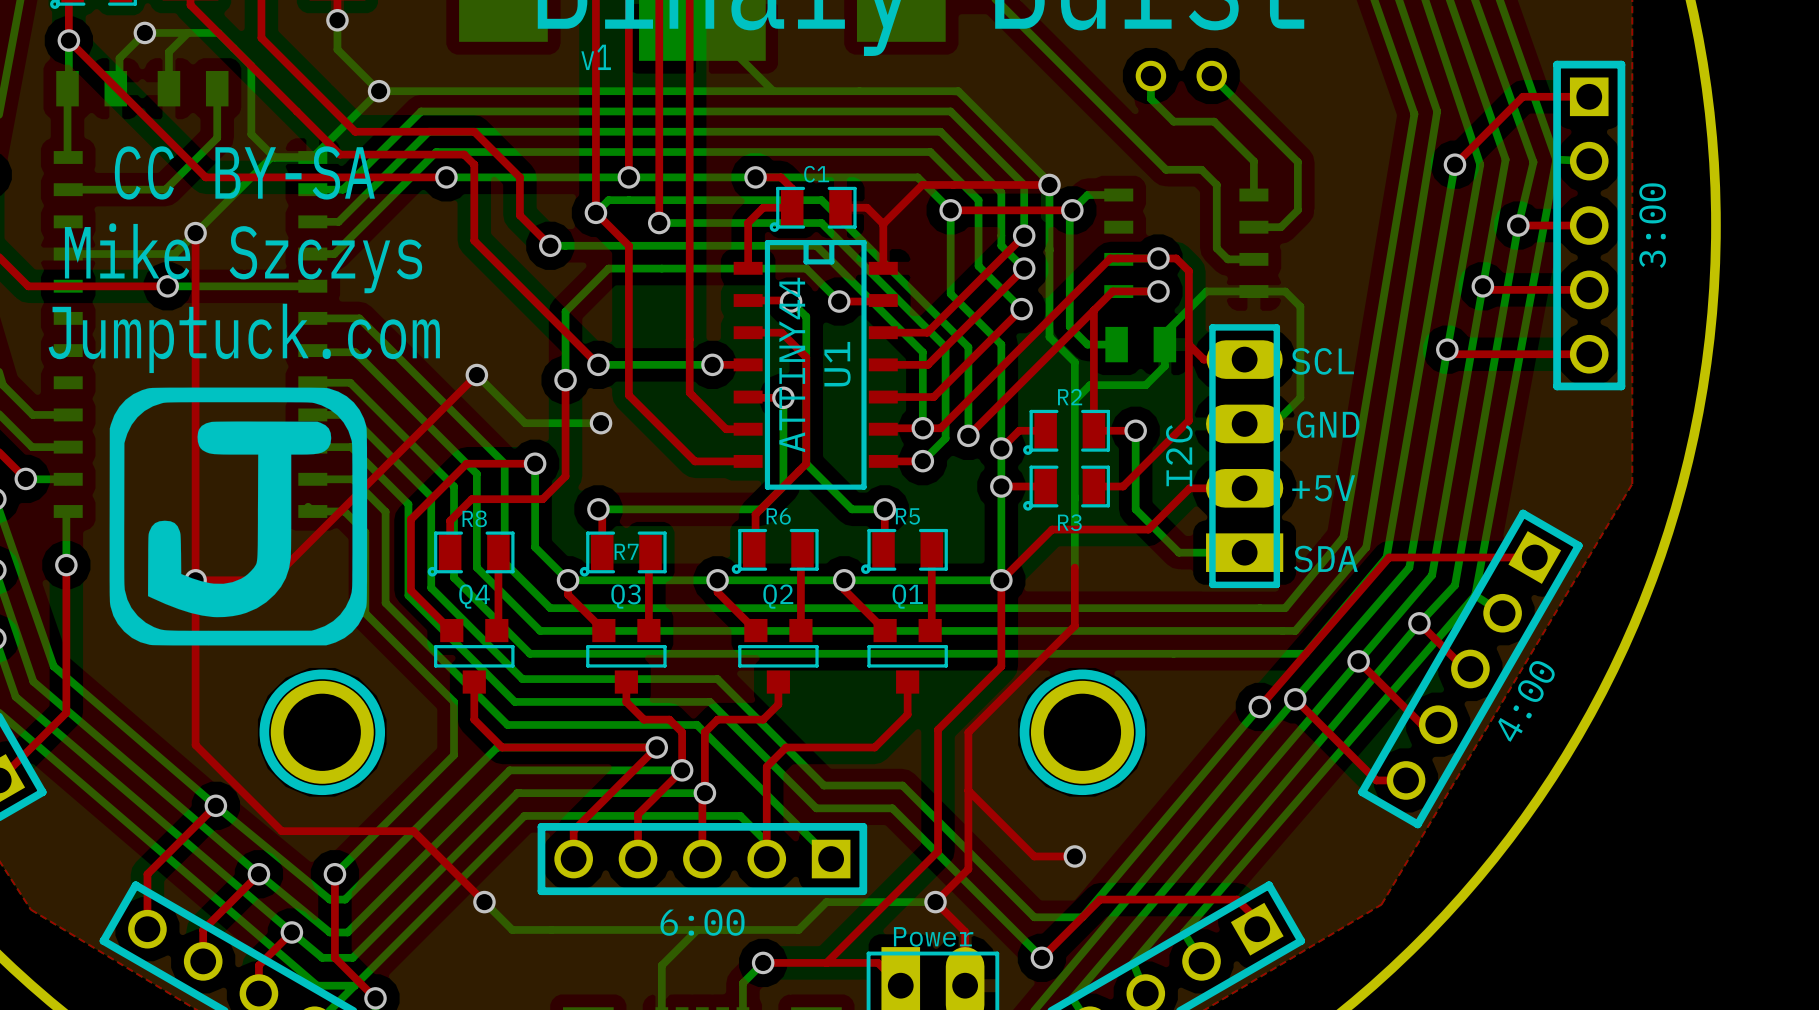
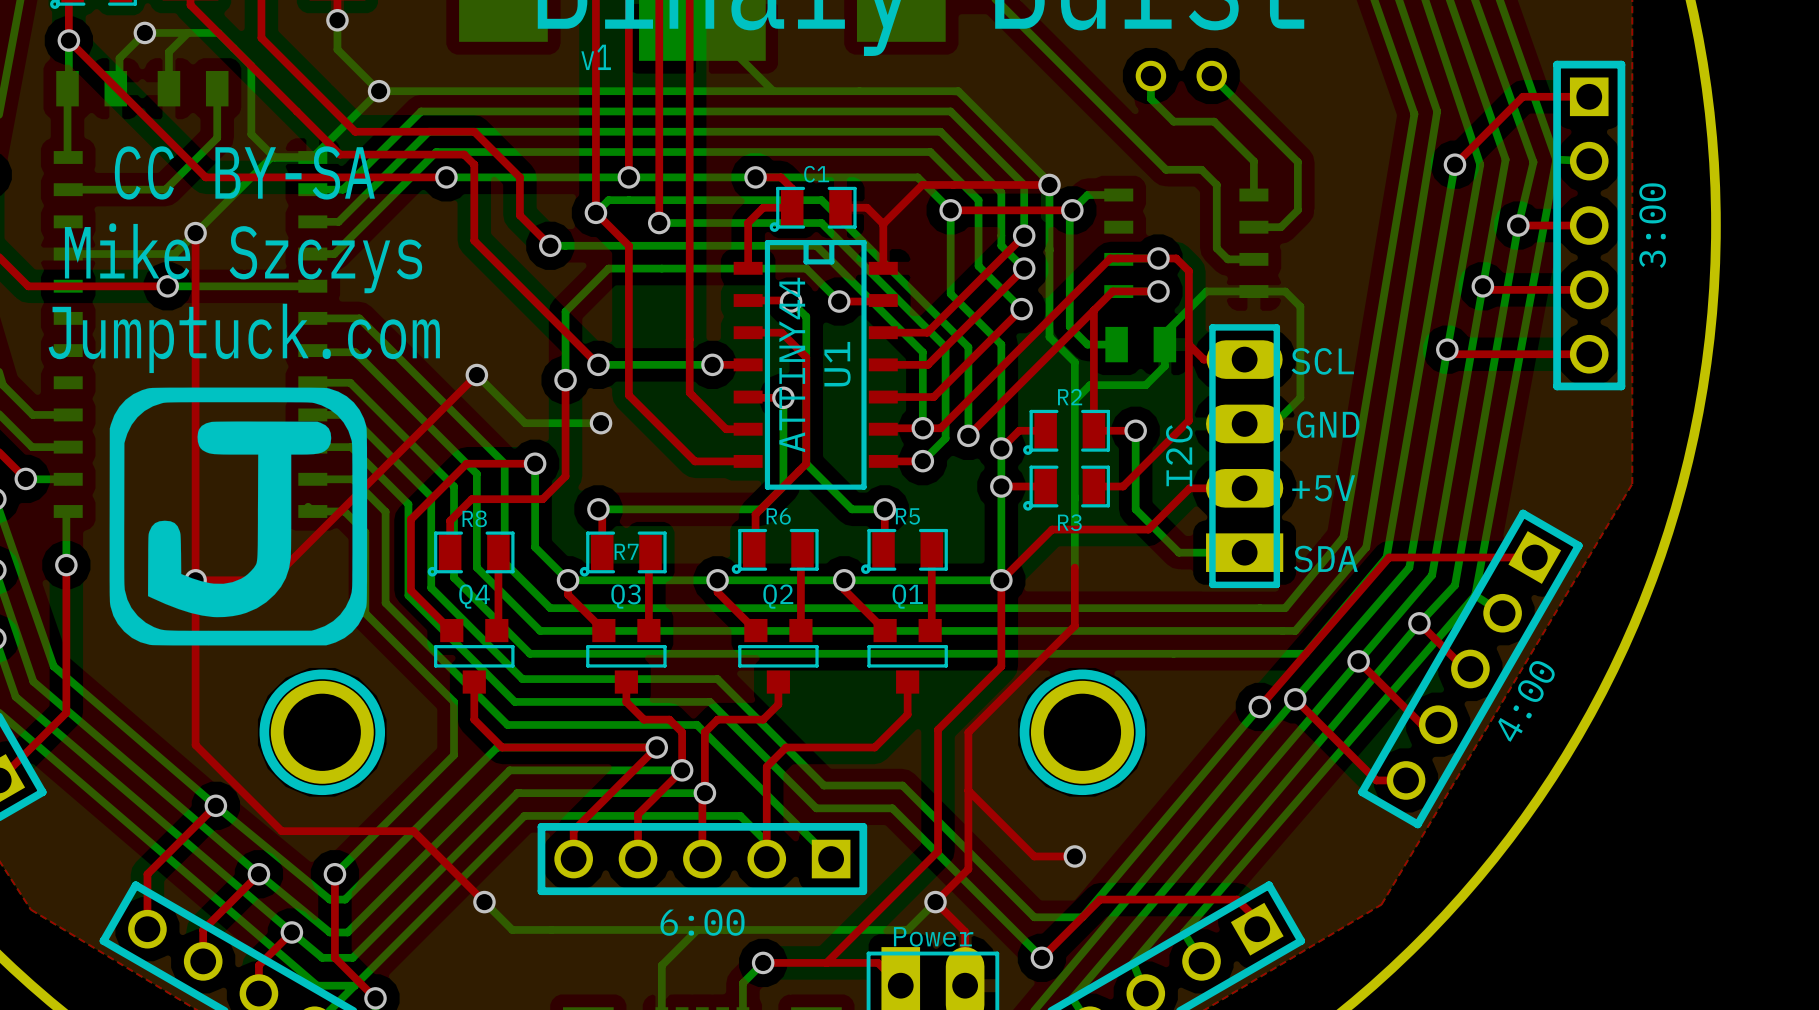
bottom track: (935, 902) (826, 902) (798, 929) -> (935, 902) (907, 929) (798, 929)

